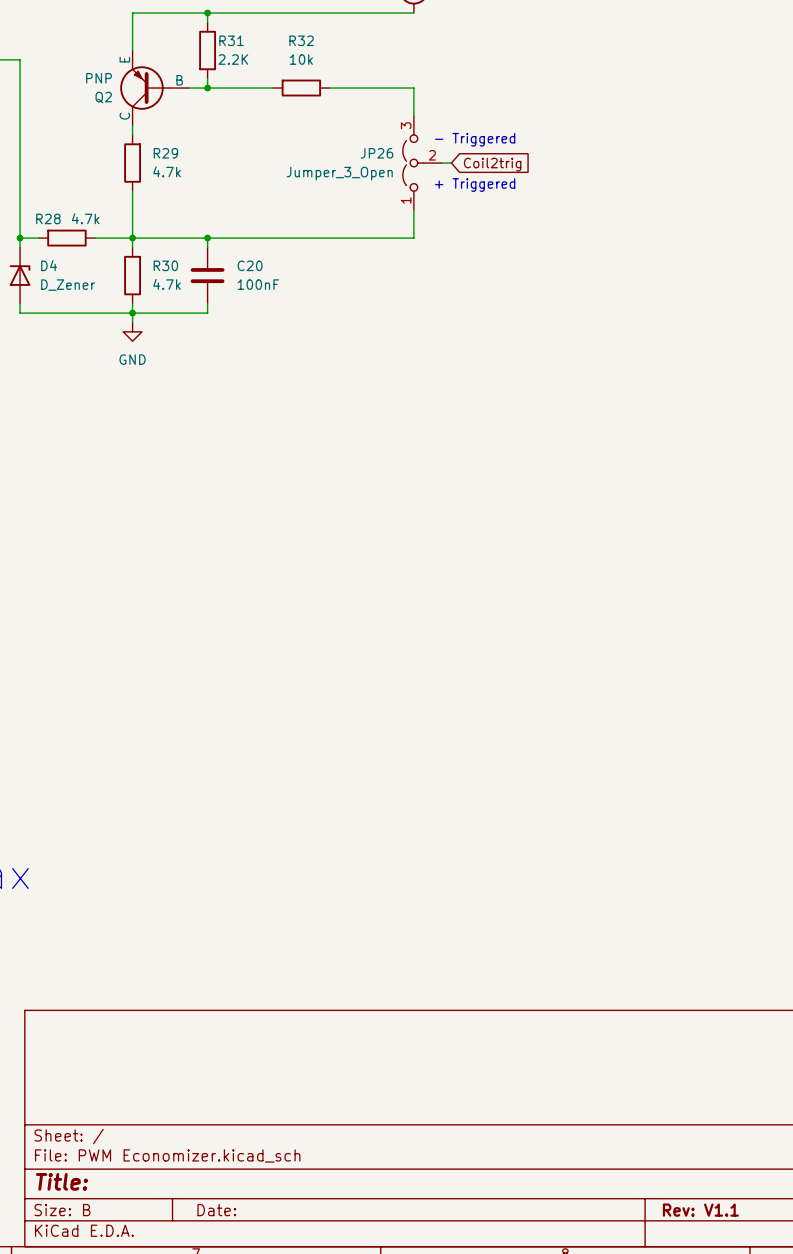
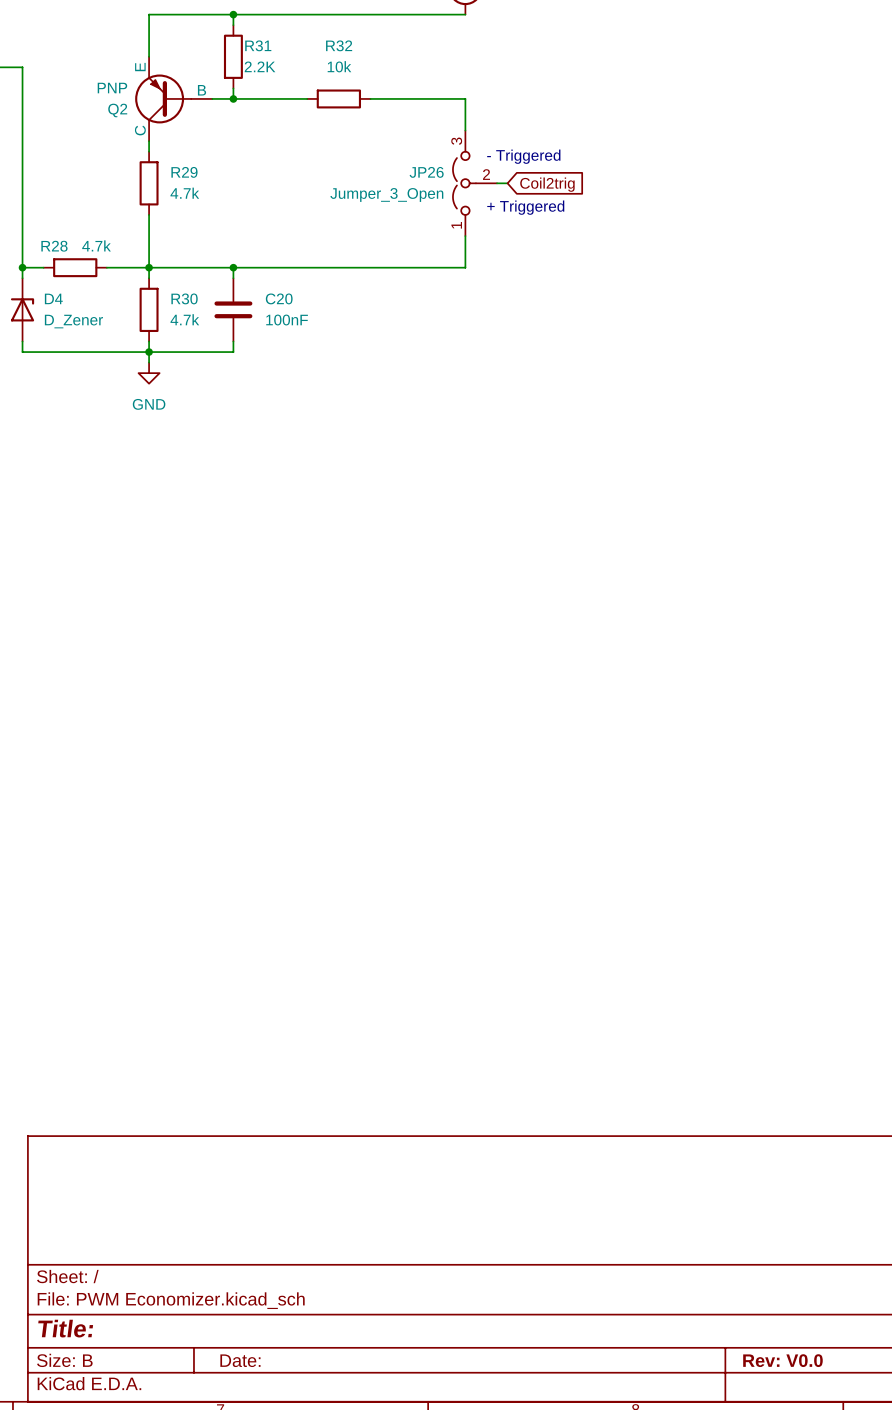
title block: Rev: V1.1 (700, 1210) -> Rev: V0.0 (782, 1360)

